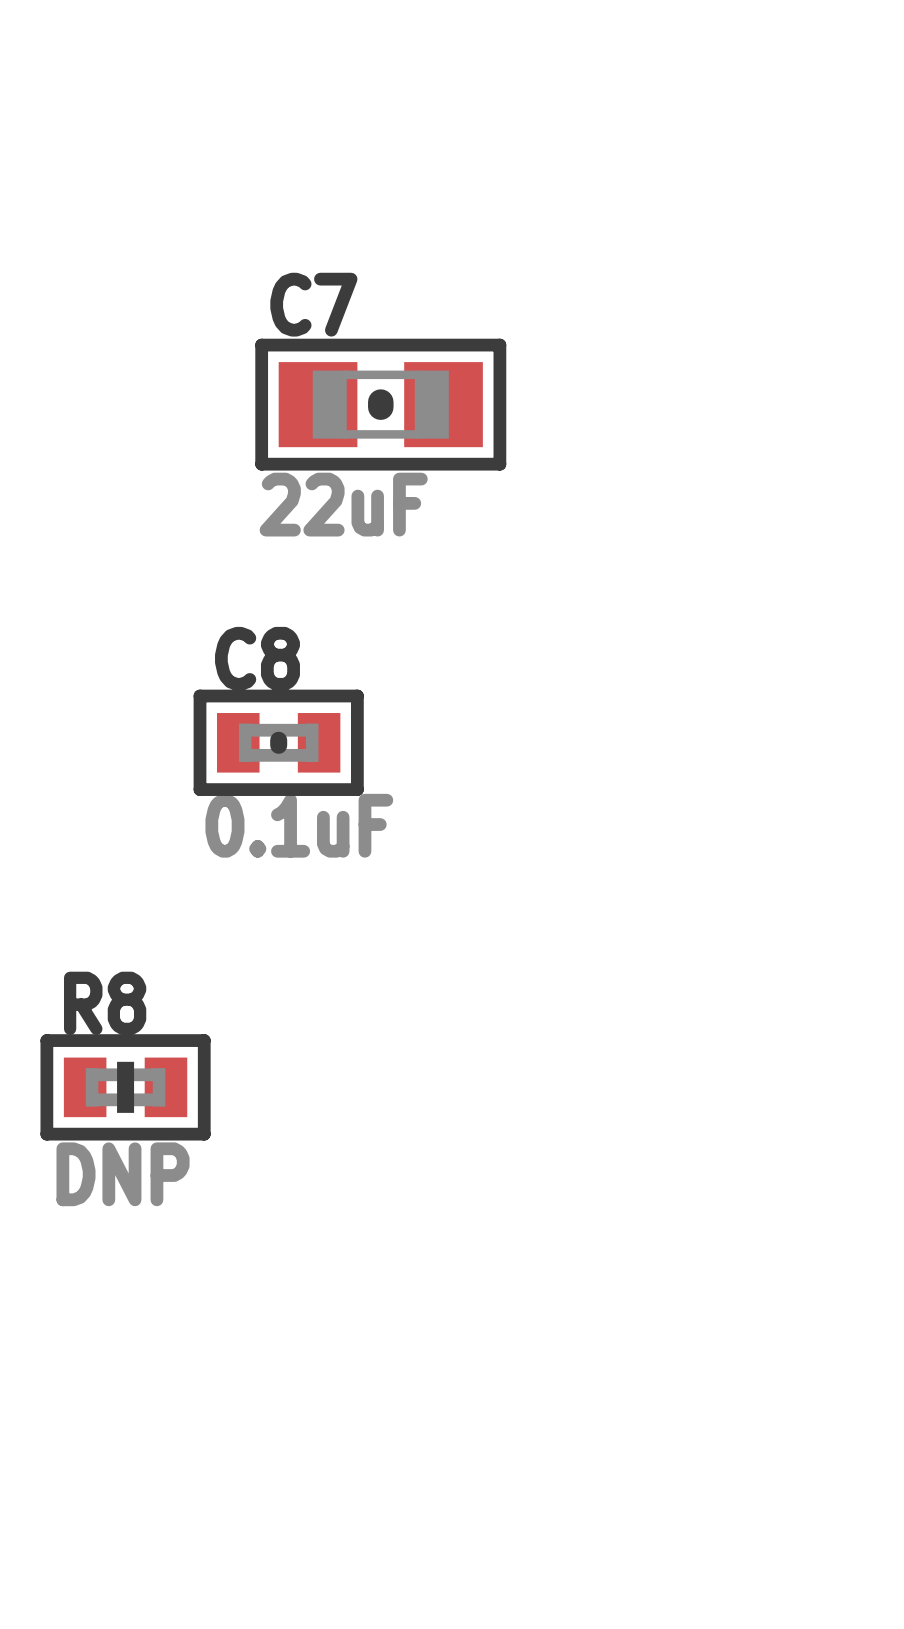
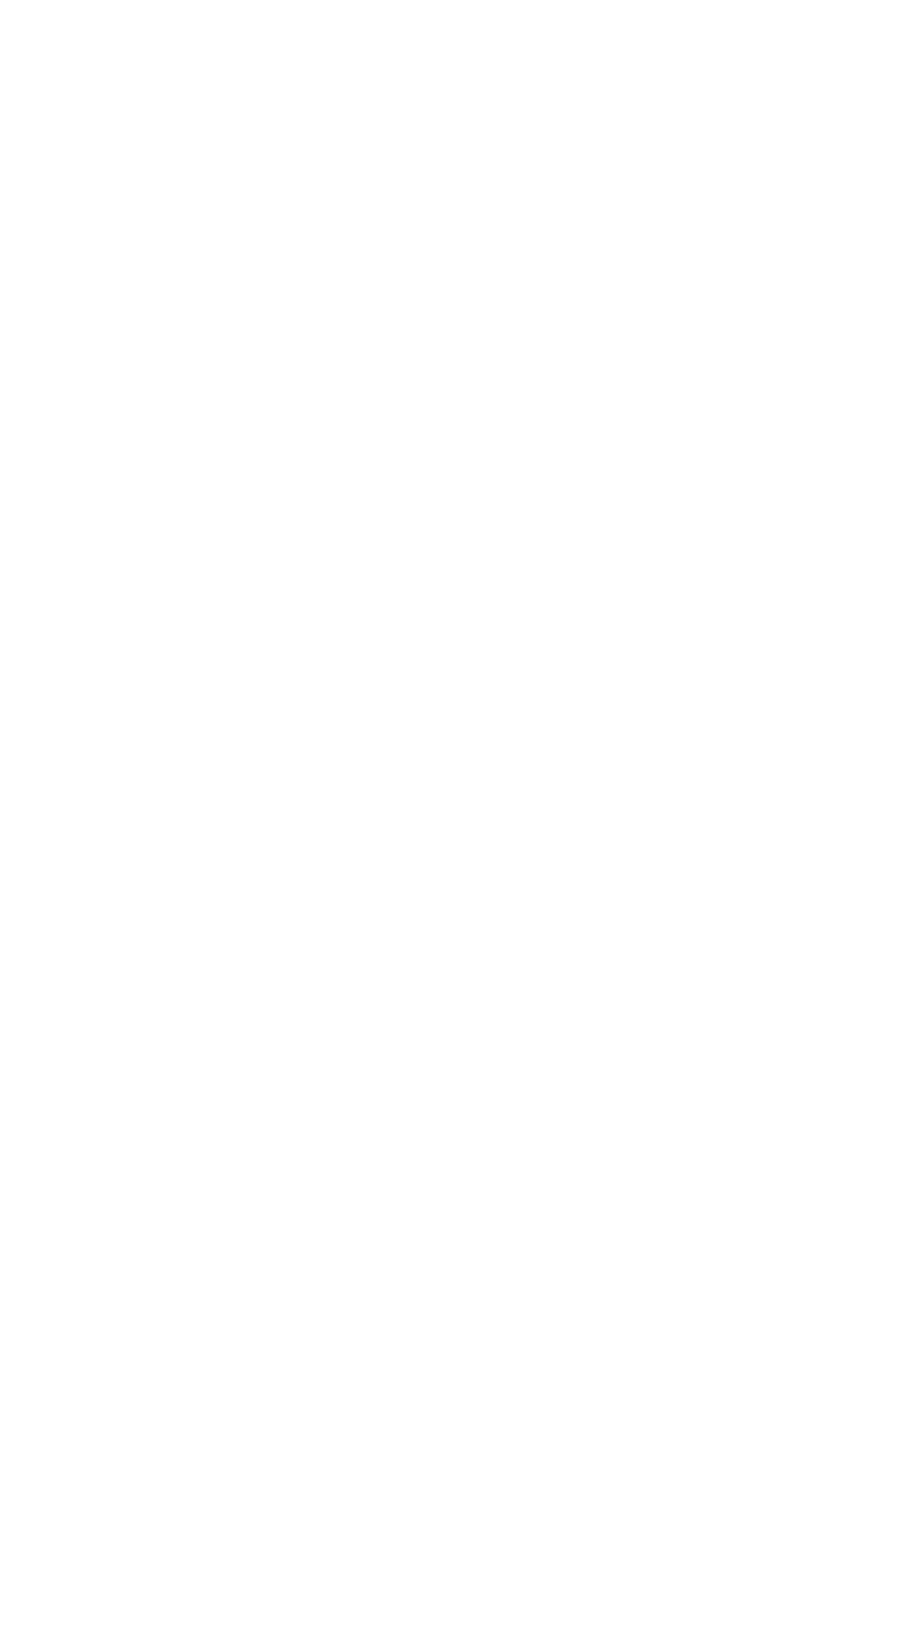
C7: 22uF (380, 404) -> none
C8: 0.1uF (278, 742) -> none
R8: DNP (125, 1087) -> none

